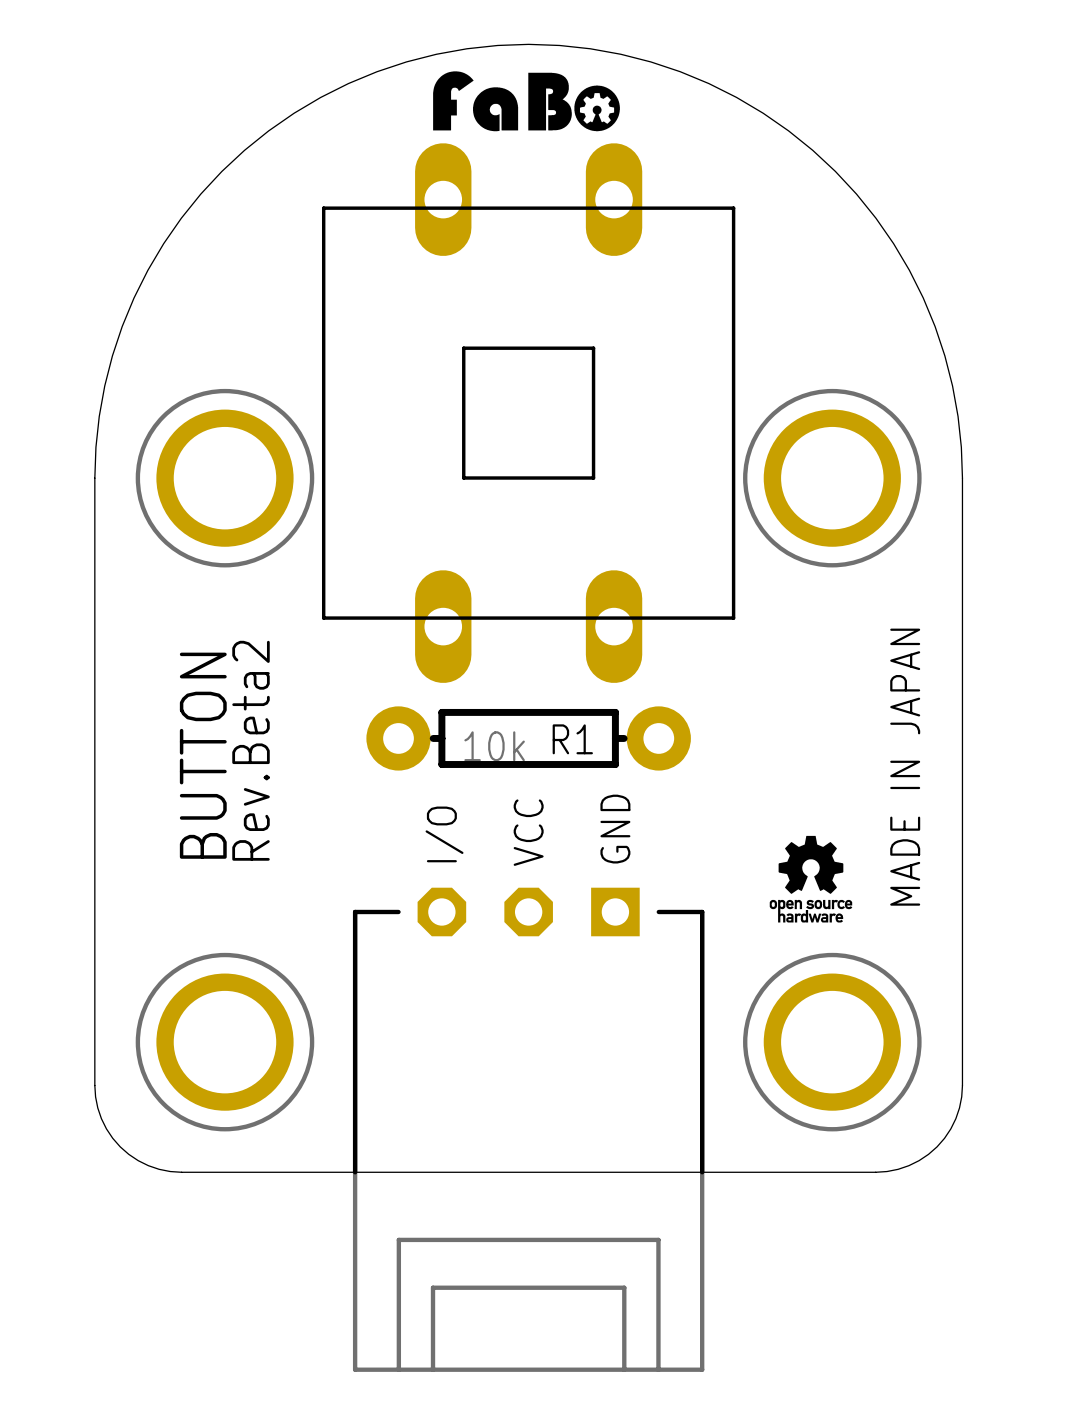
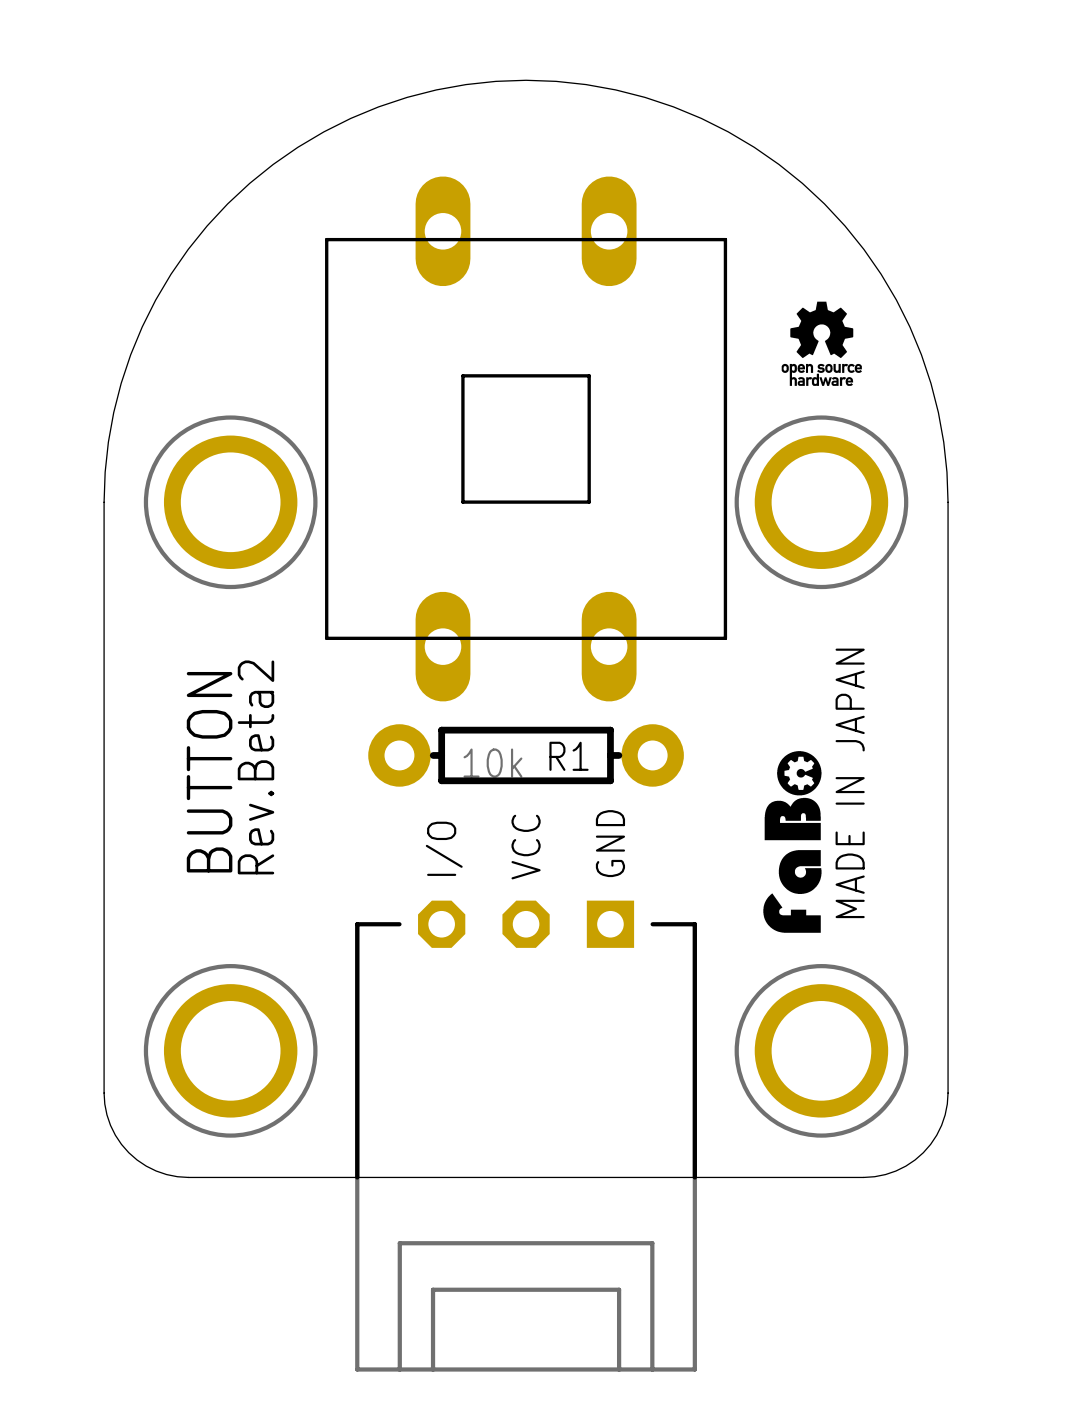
drawing: [433, 71, 620, 132] -> none
drawing: none -> [763, 751, 822, 933]
text position: MADE IN JAPAN (905, 767) -> MADE IN JAPAN (850, 783)
drawing position: (810, 879) -> (821, 343)

